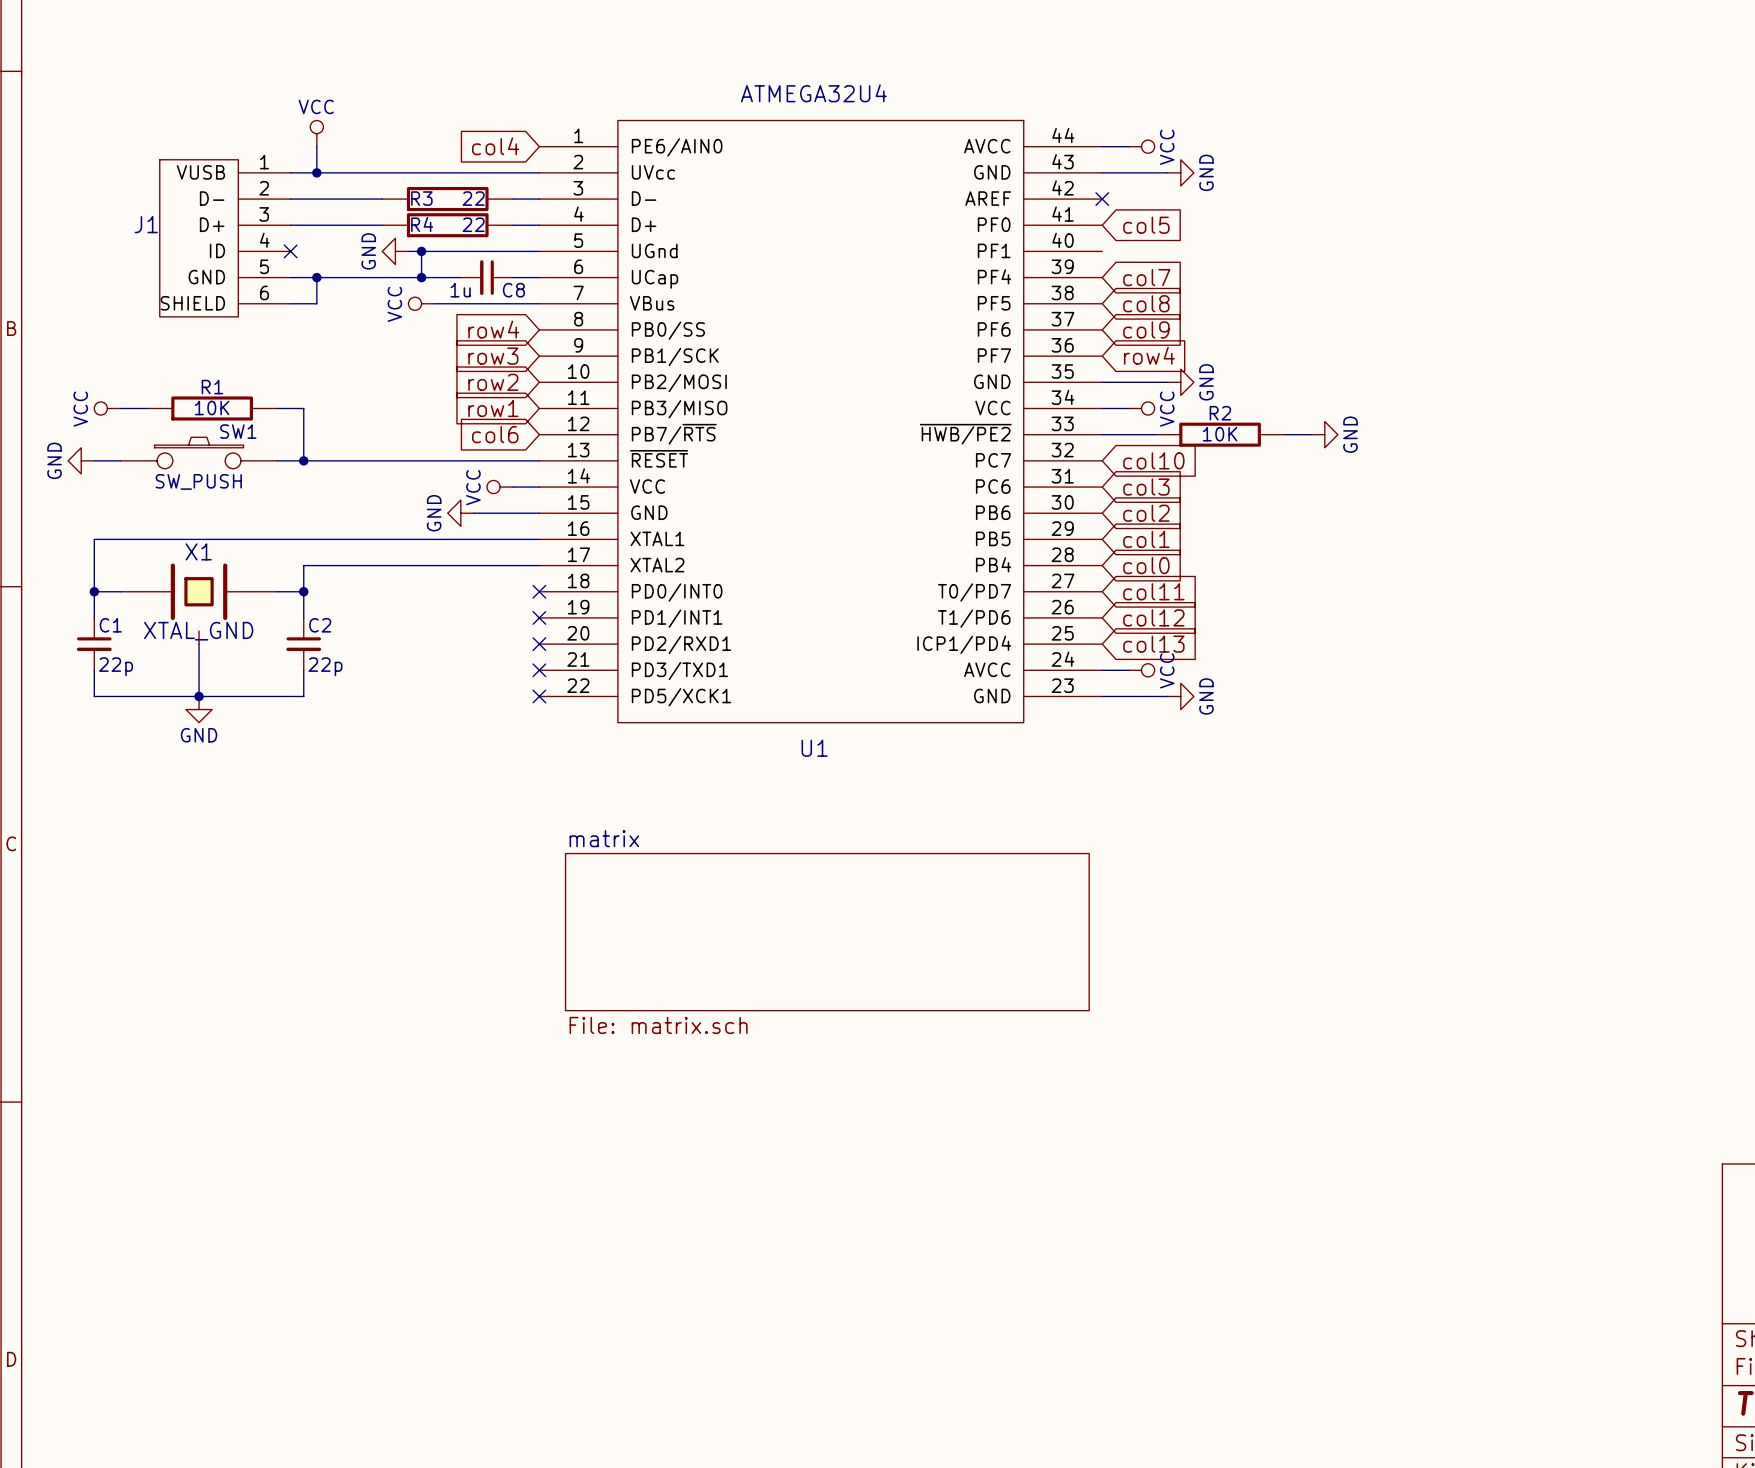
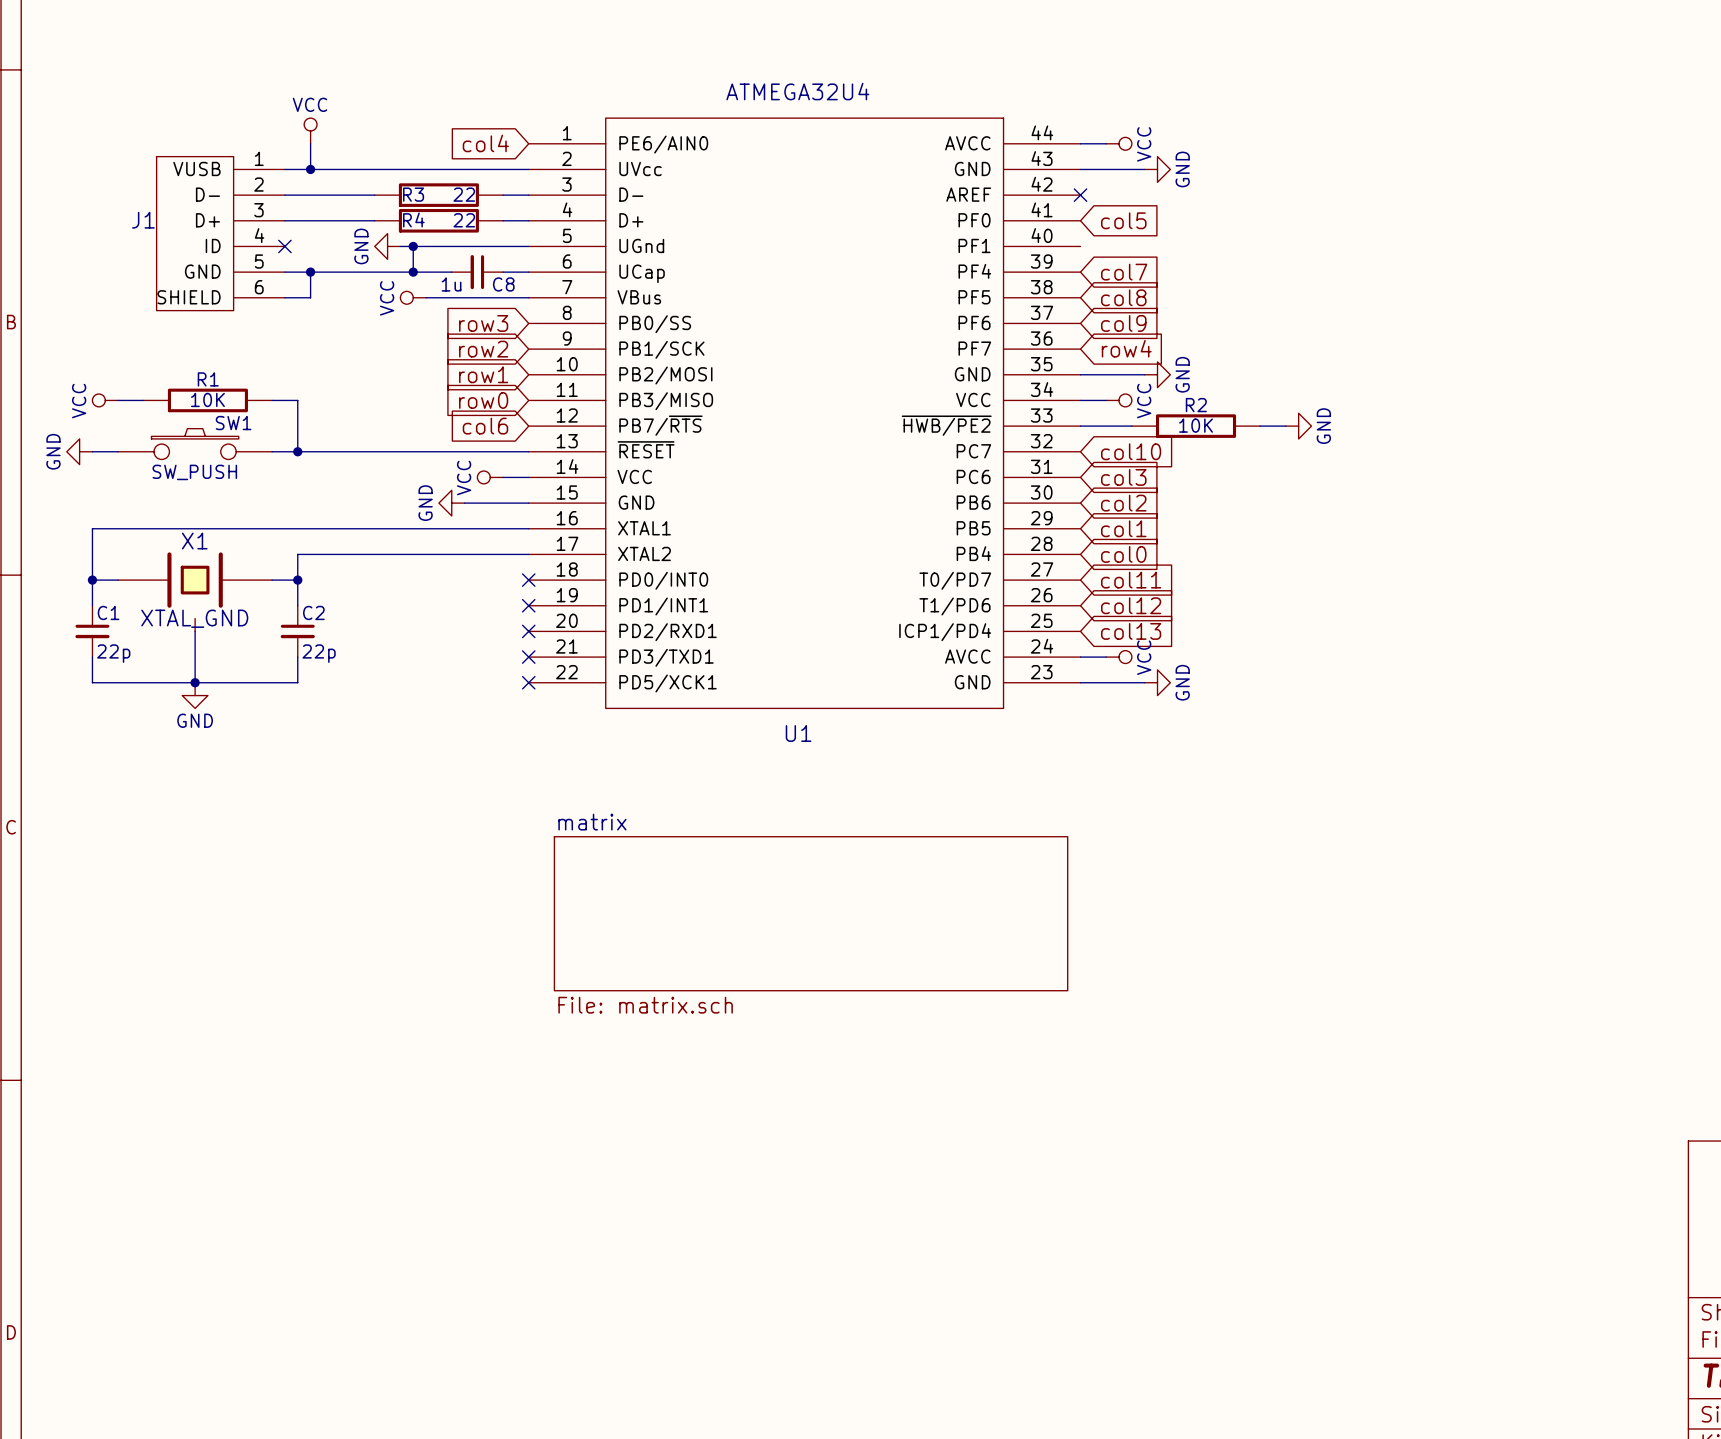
global label: row4 (493, 329) -> row3 (483, 323)
global label: row3 (493, 356) -> row2 (483, 349)
global label: row2 (493, 382) -> row1 (483, 374)
global label: row1 (493, 408) -> row0 (483, 400)

